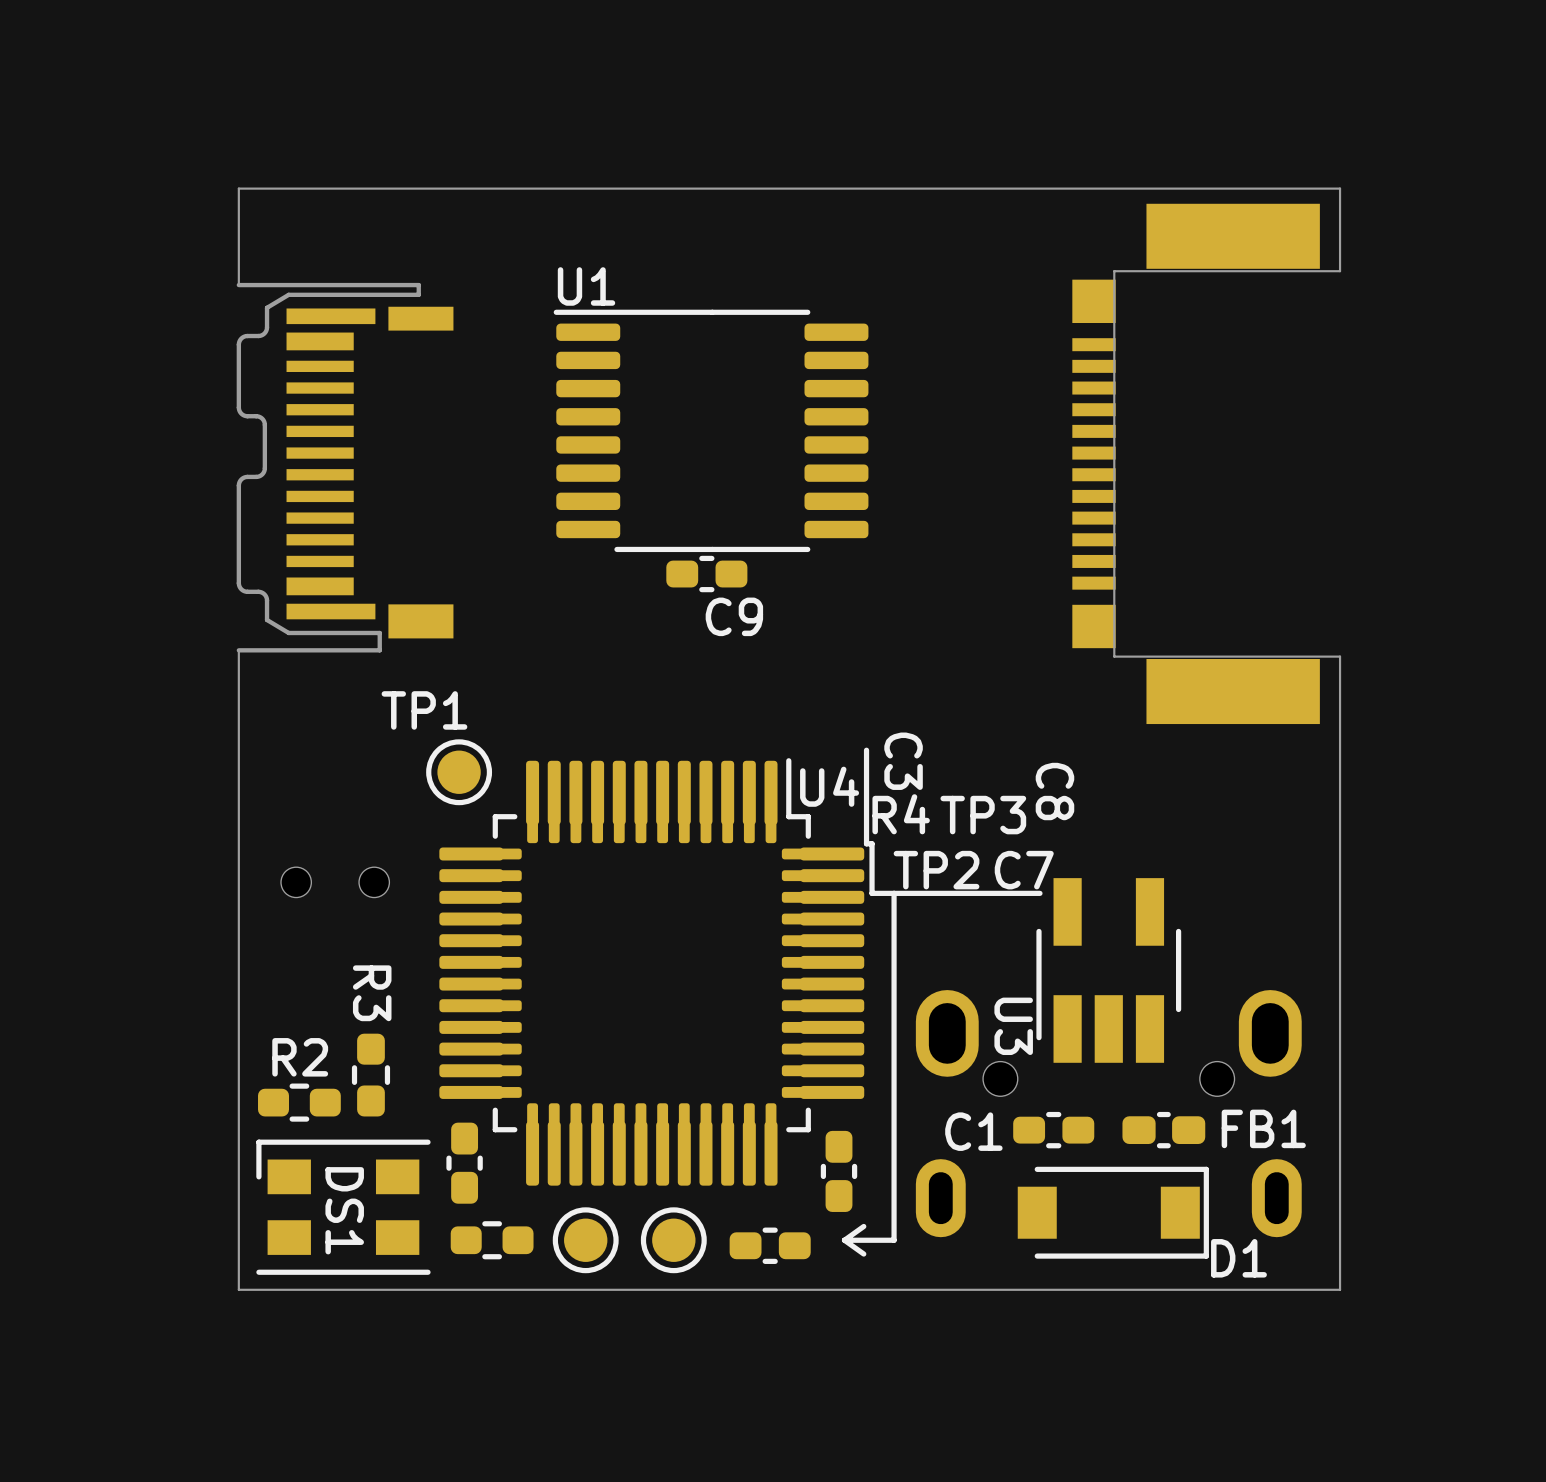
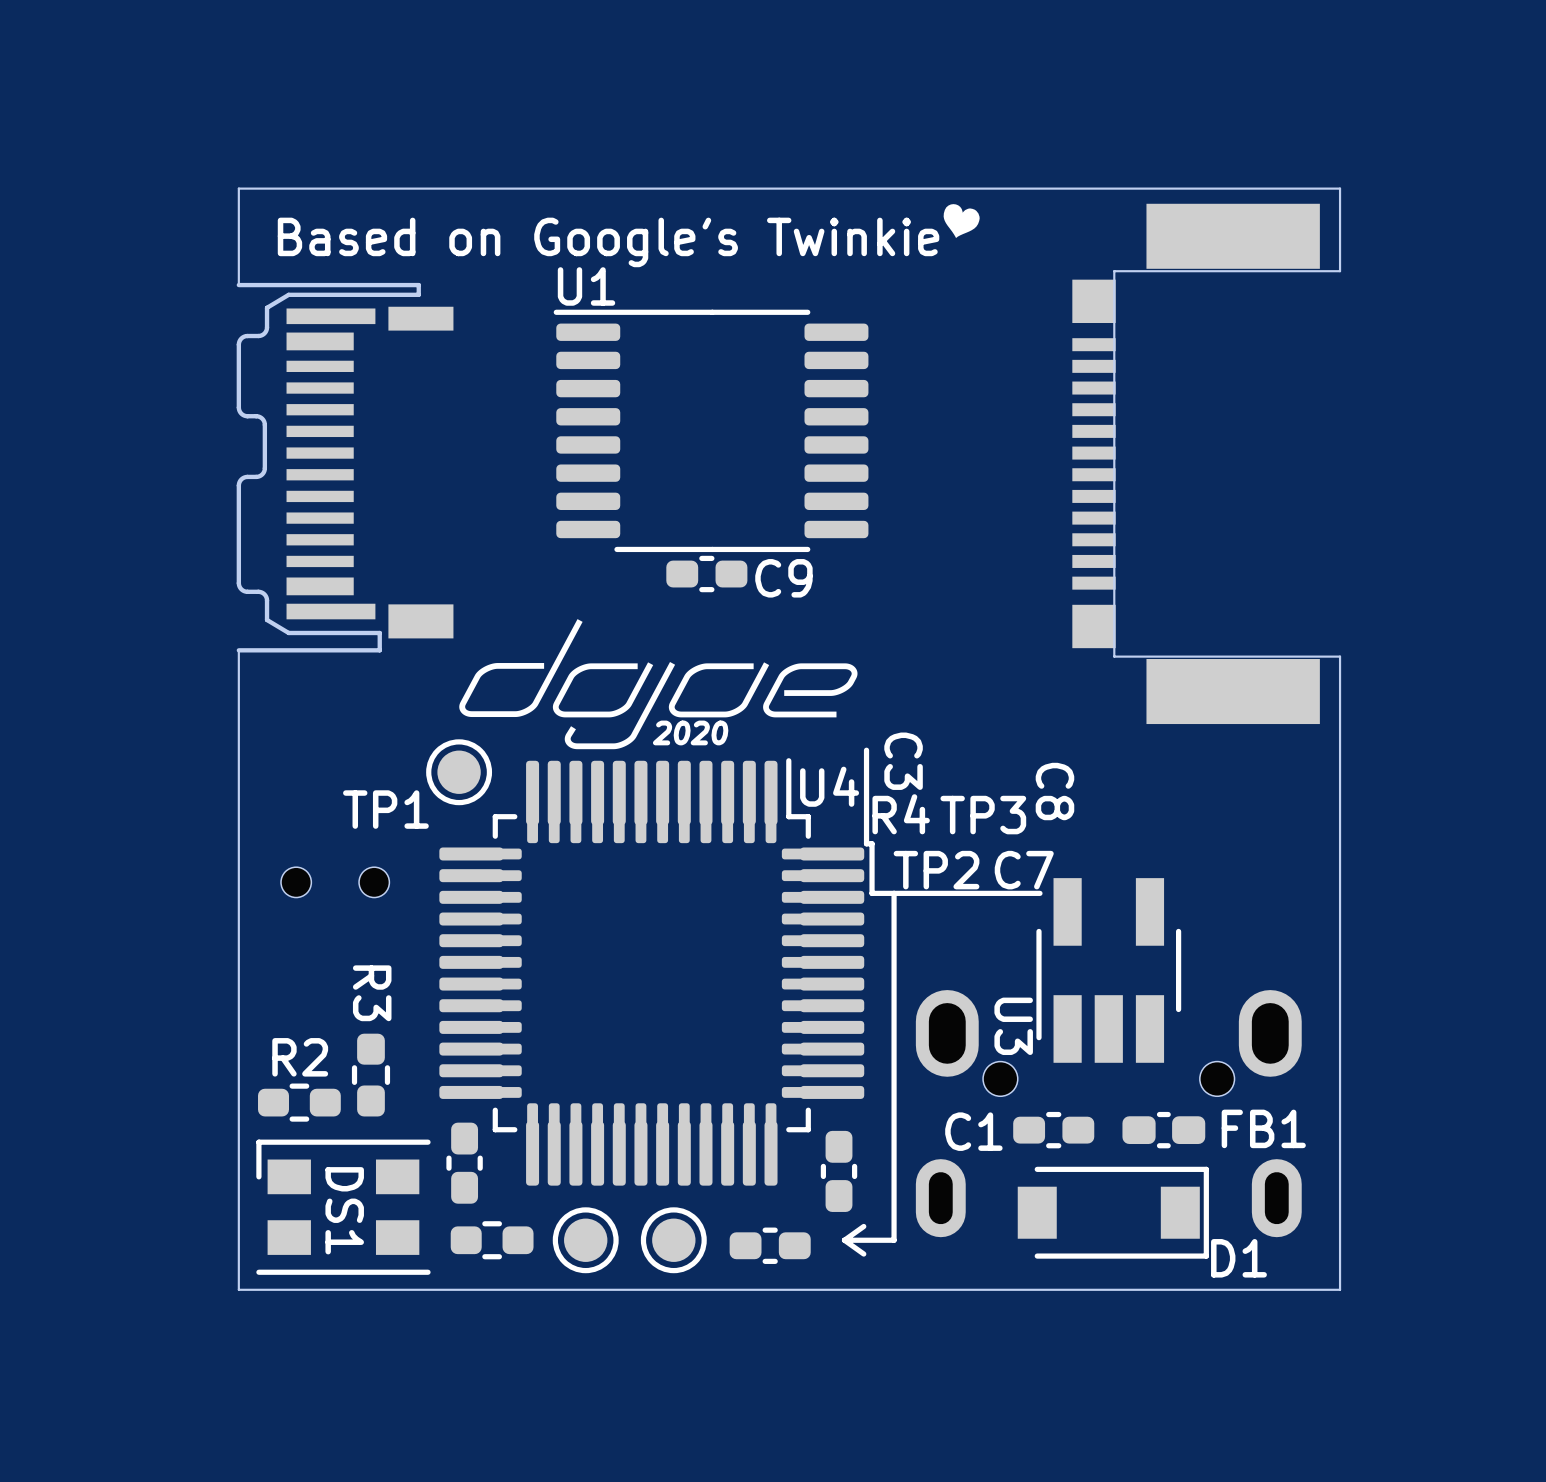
drawing: none -> [943, 204, 980, 238]
text: none -> Based on Google's Twinkie (608, 242)
C9 name position: C9 (734, 616) -> C9 (783, 578)
drawing: none -> [459, 619, 858, 750]
TP1 name position: TP1 (424, 710) -> TP1 (385, 809)
text: none -> 2020 (690, 732)

